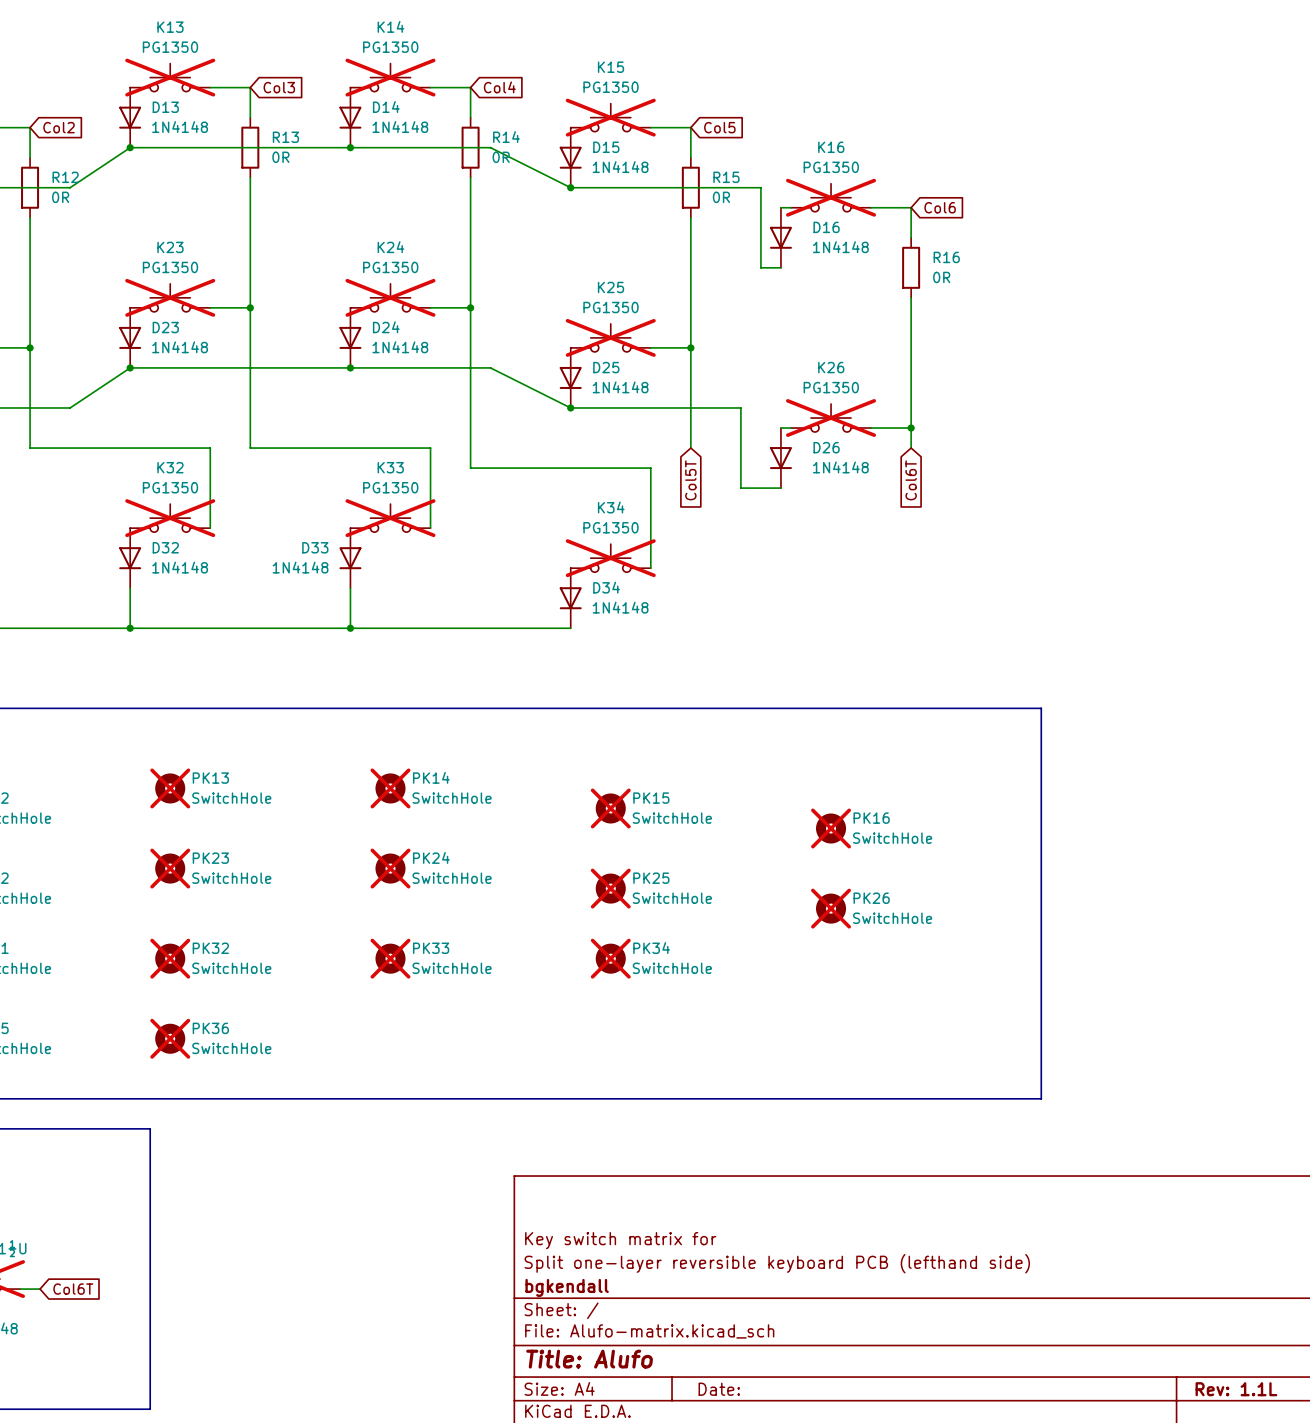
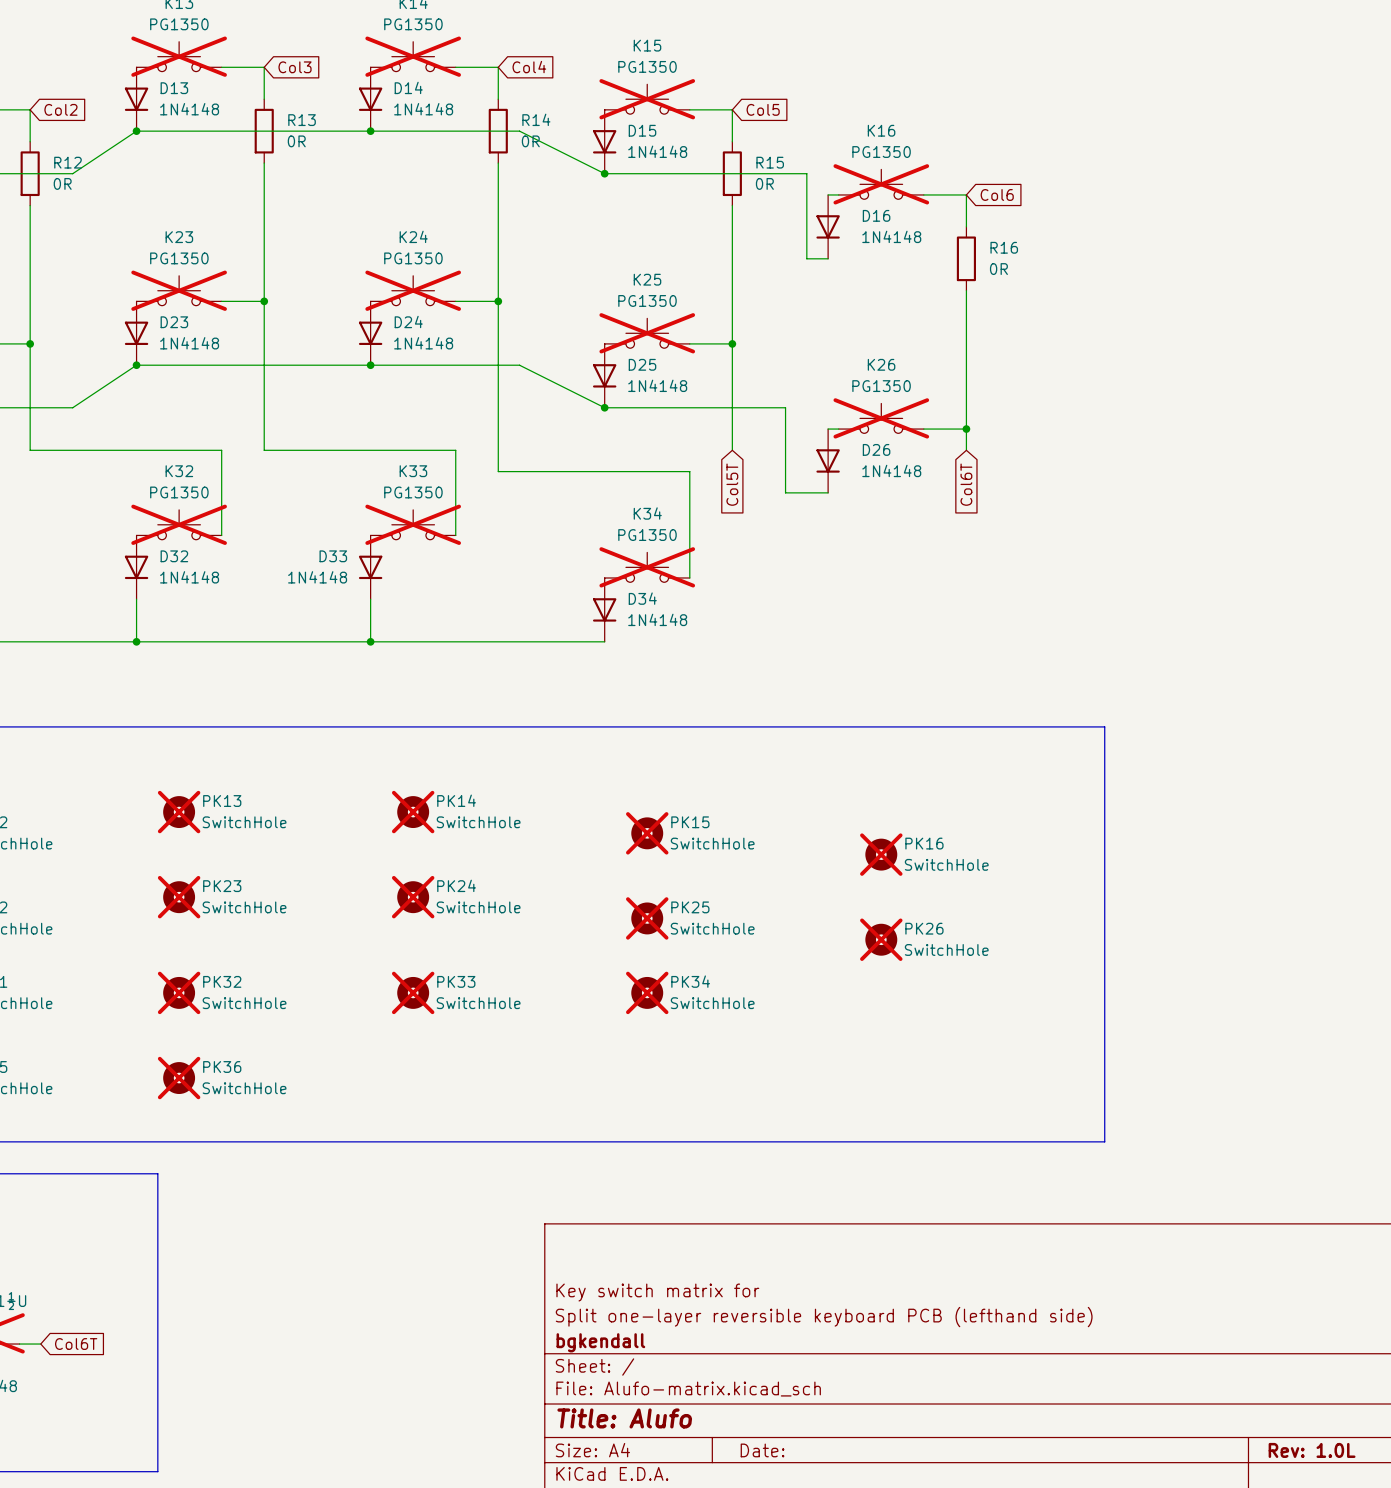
title block: Rev: 1.1L (1236, 1389) -> Rev: 1.0L (1312, 1450)

